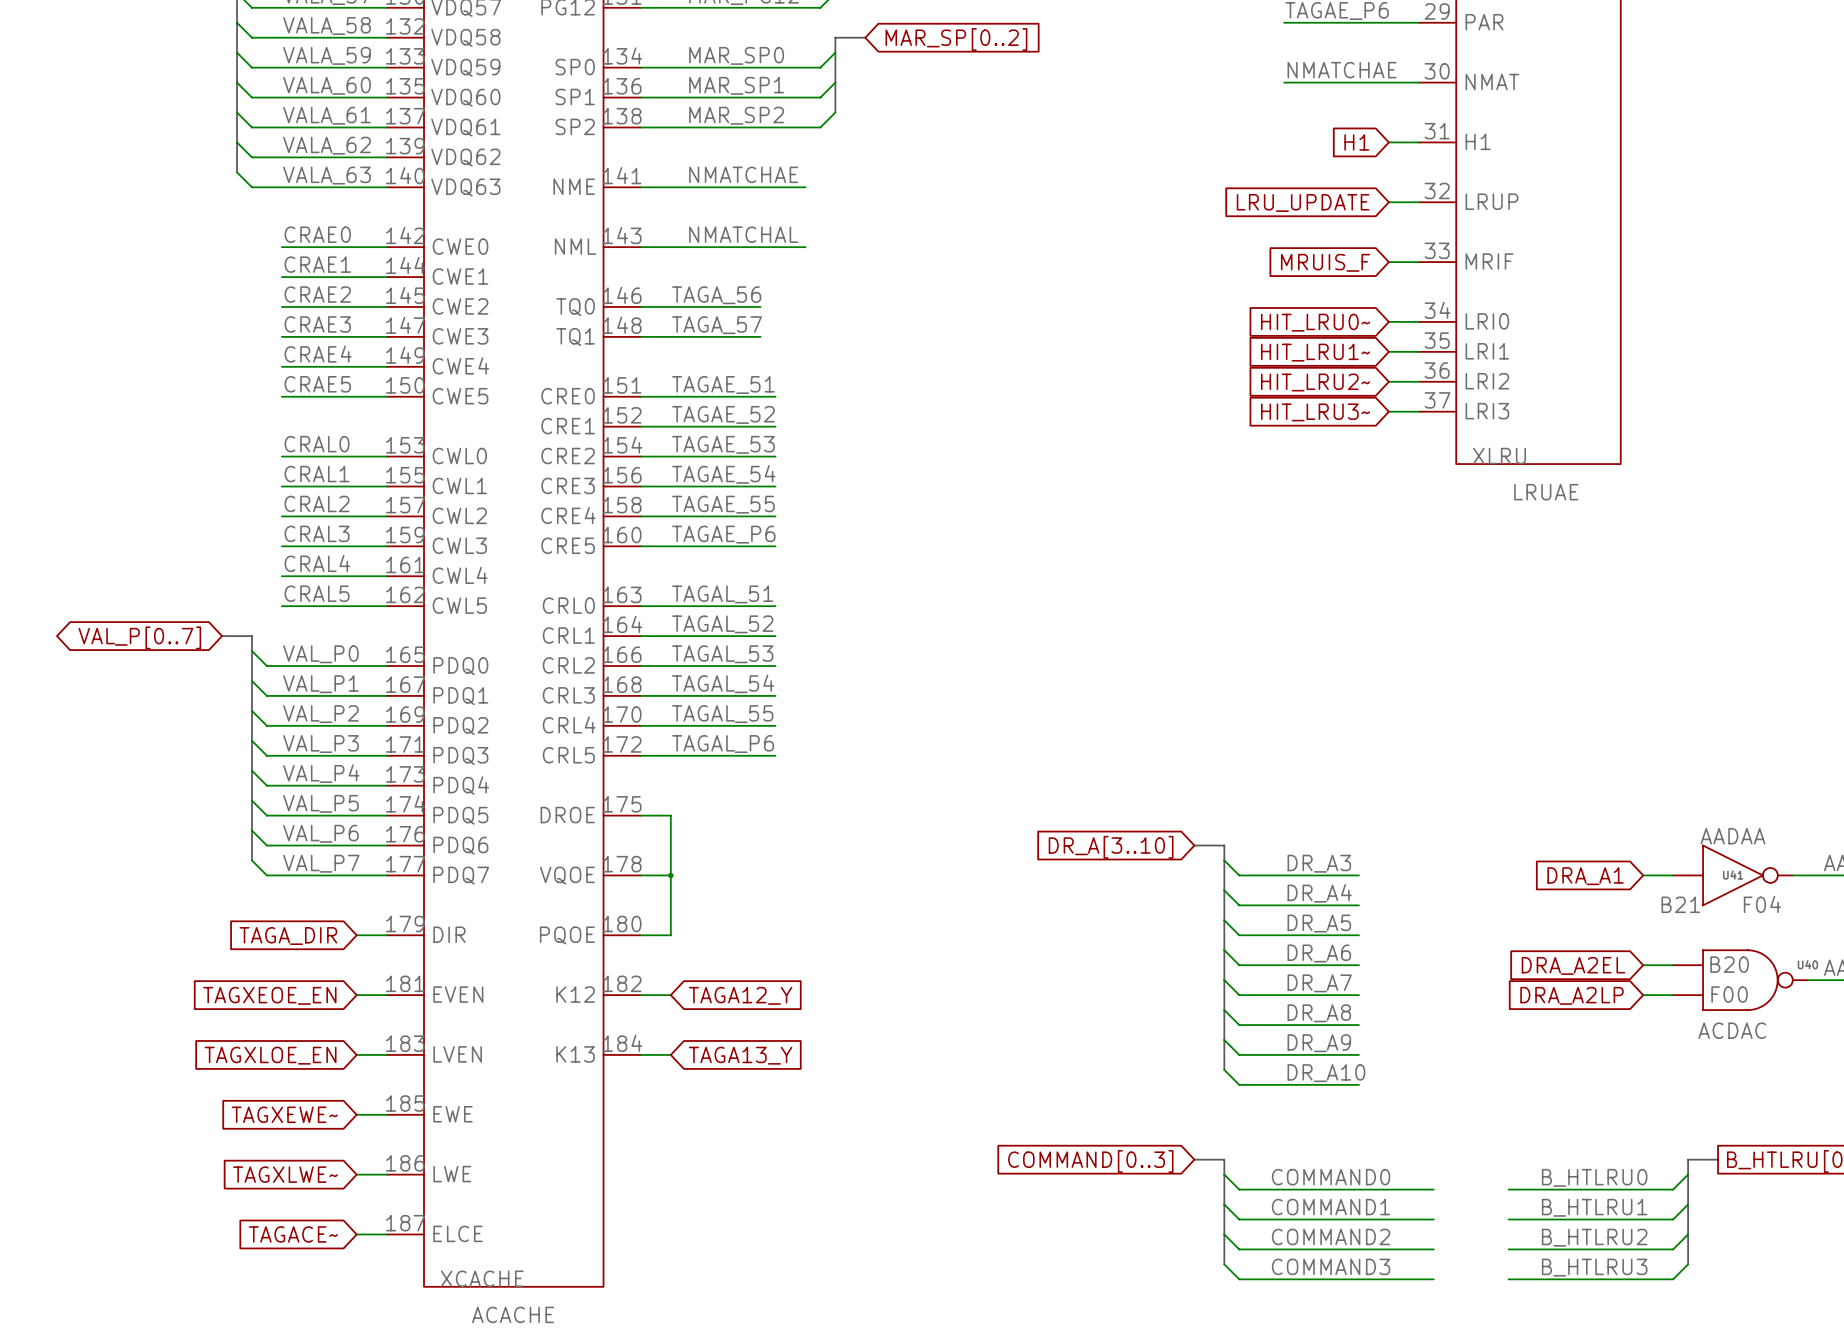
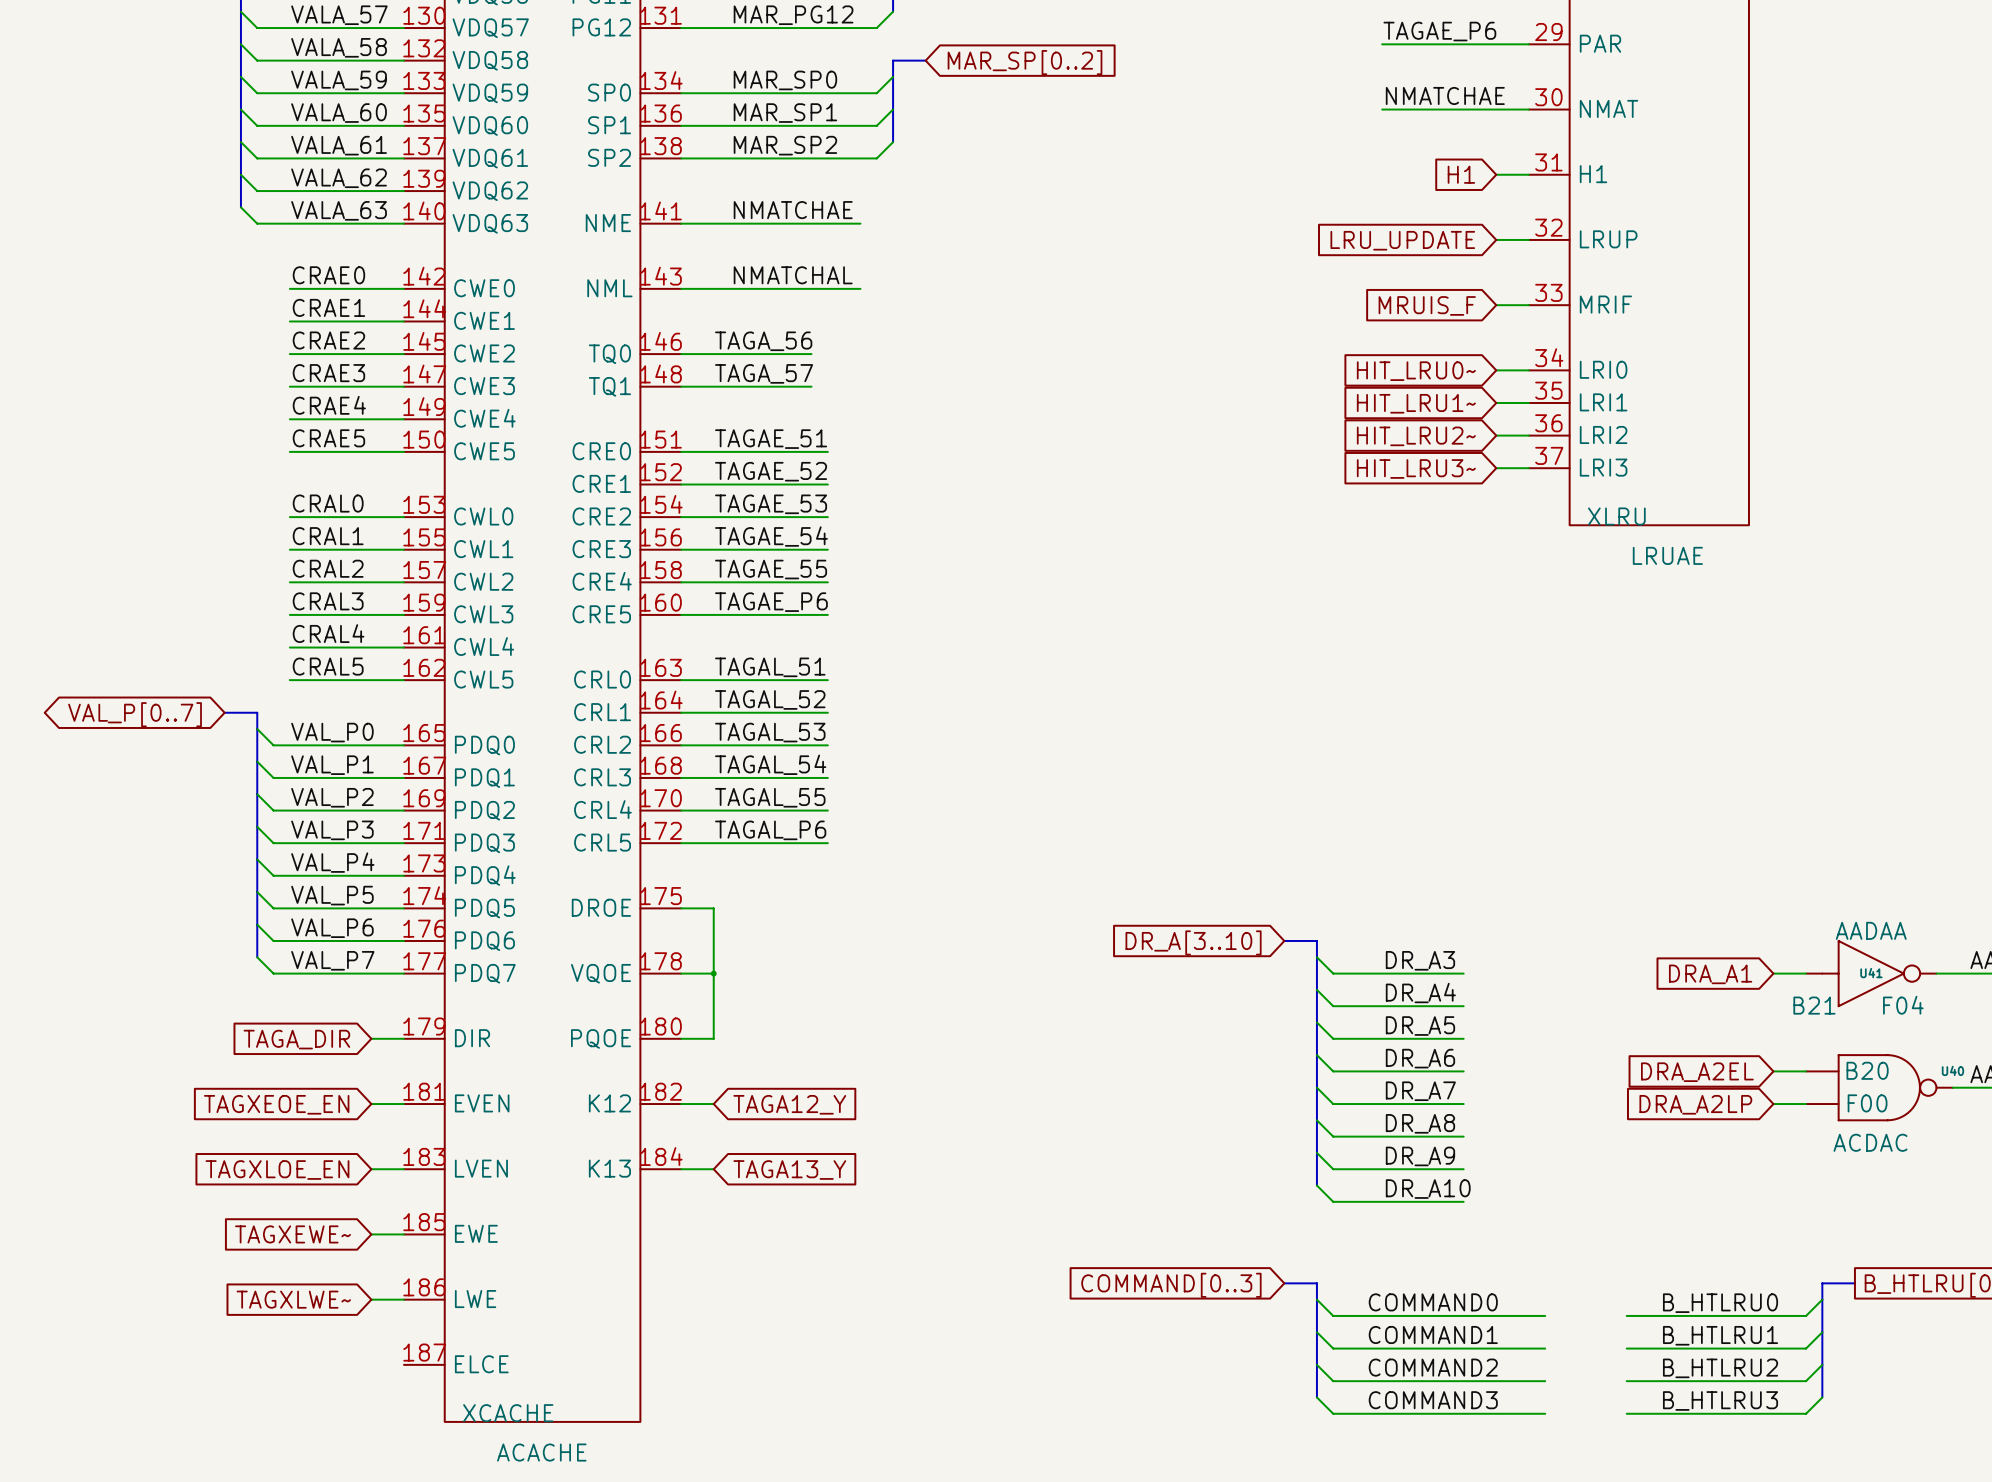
global label: TAGACE~ (293, 1234) -> none
wire: (356, 1234) (386, 1234) -> none

